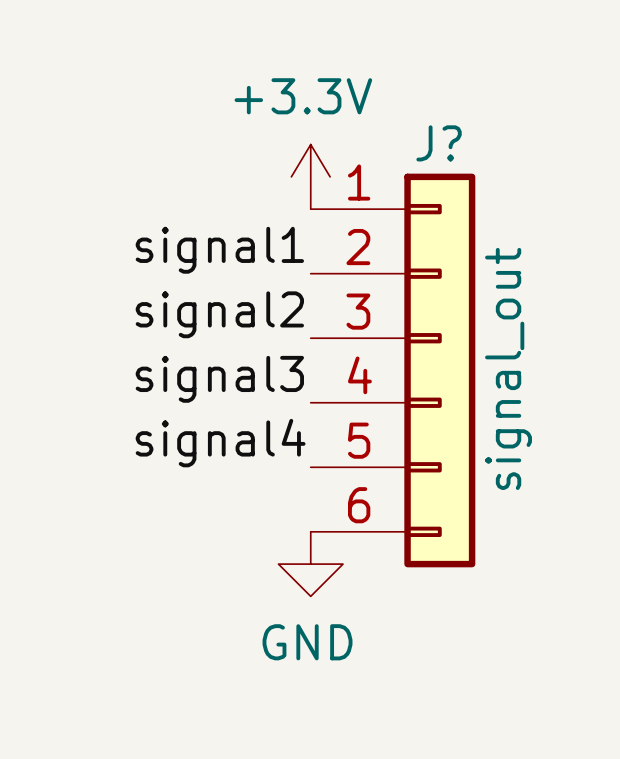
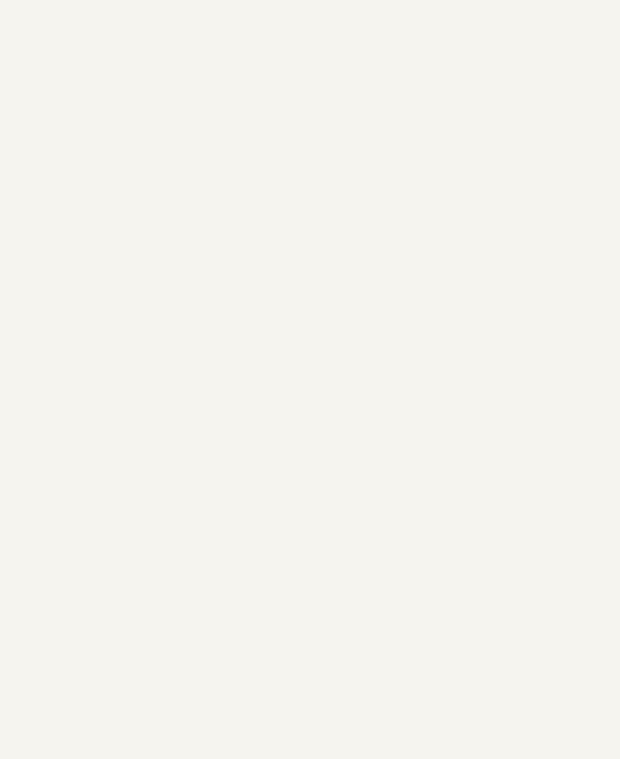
power symbol: +3.3V (310, 176) -> none
label: signal1 (219, 250) -> none
label: signal2 (219, 314) -> none
J?: signal_out (393, 370) -> none
label: signal3 (219, 379) -> none
label: signal4 (220, 443) -> none
power symbol: GND (310, 564) -> none

